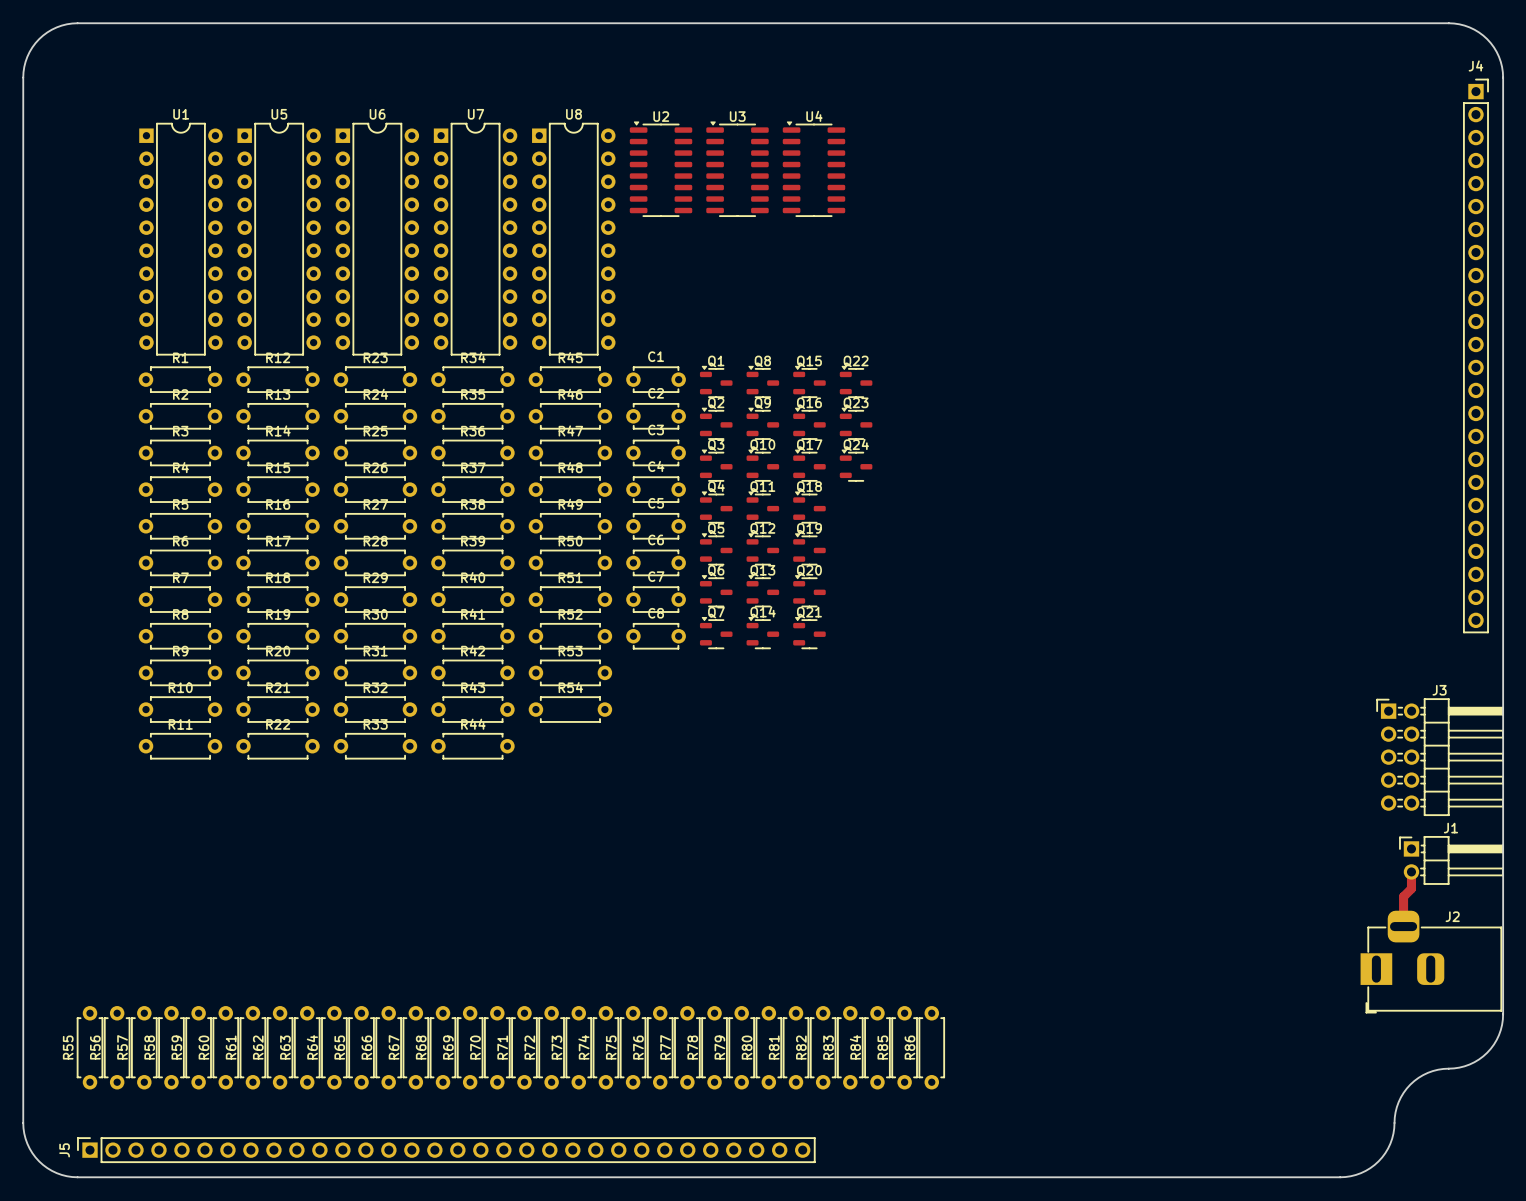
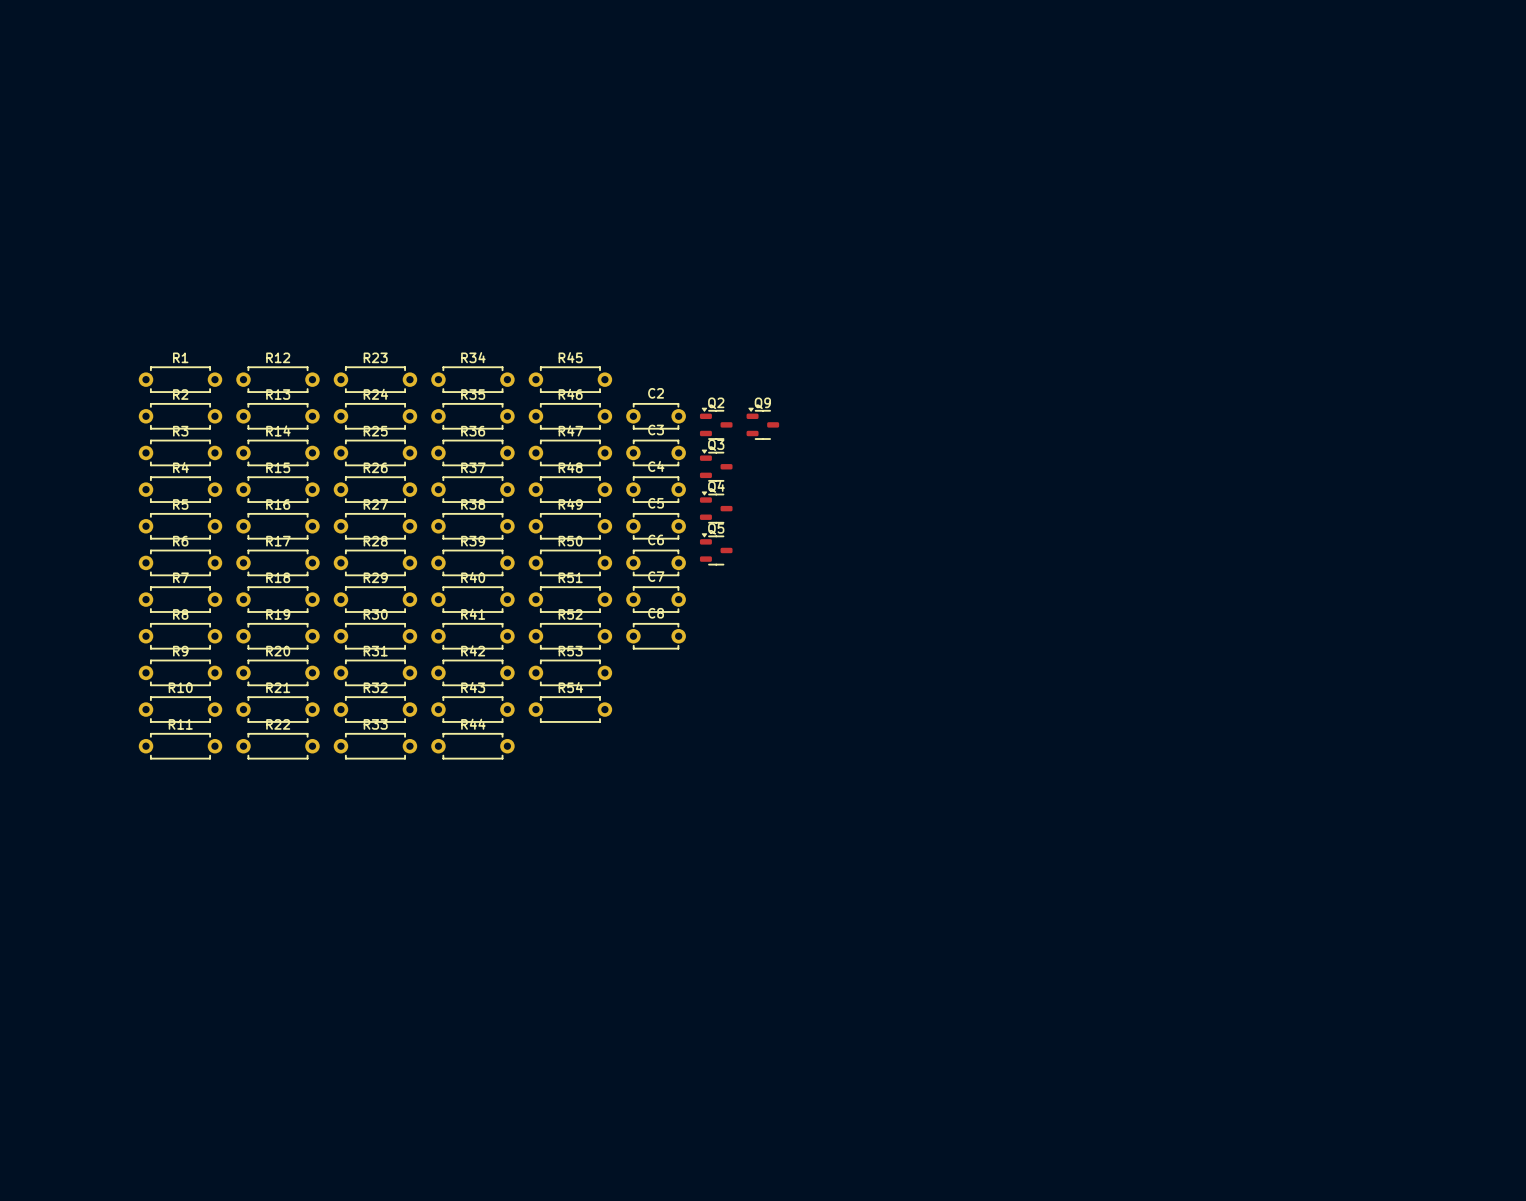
board edge: (77, 23) (1448, 23) (1464, 25) (1478, 32) (1490, 43) (1496, 51) (1502, 66) (1503, 77) (1503, 1014) (1500, 1030) (1493, 1044) (1483, 1056) (1469, 1064) (1433, 1071) (1414, 1080) (1403, 1092) (1398, 1102) (1392, 1138) (1385, 1153) (1370, 1168) (1360, 1173) (1345, 1177) (77, 1177) (61, 1174) (47, 1168) (39, 1161) (29, 1148) (25, 1138) (23, 1122) (23, 77) (27, 56) (39, 39) (56, 27) (77, 23) -> none
U2: (661, 169) -> none
U3: (737, 169) -> none
U4: (813, 169) -> none
U1: (180, 239) -> none
U5: (279, 239) -> none
U6: (377, 239) -> none
U7: (475, 239) -> none
U8: (573, 239) -> none
J4: (1475, 355) -> none
C1: (656, 379) -> none
Q1: (716, 381) -> none
Q8: (762, 381) -> none
Q15: (809, 381) -> none
Q22: (856, 381) -> none
Q16: (809, 423) -> none
Q23: (856, 423) -> none
Q10: (762, 465) -> none
Q17: (809, 465) -> none
Q24: (856, 465) -> none
Q11: (762, 507) -> none
Q18: (809, 507) -> none
Q12: (762, 549) -> none
Q19: (809, 549) -> none
Q6: (716, 591) -> none
Q13: (762, 591) -> none
Q20: (809, 591) -> none
Q7: (716, 632) -> none
Q14: (762, 632) -> none
Q21: (809, 632) -> none
J3: (1440, 757) -> none
J1: (1451, 860) -> none
track: (1411, 871) (1411, 888) (1403, 896) (1403, 926) -> none
J2: (1431, 961) -> none
R55: (90, 1047) -> none
R56: (117, 1047) -> none
R57: (144, 1047) -> none
R58: (171, 1047) -> none
R59: (198, 1047) -> none
R60: (225, 1047) -> none
R61: (252, 1047) -> none
R62: (280, 1047) -> none
R63: (307, 1047) -> none
R64: (334, 1047) -> none
R65: (361, 1047) -> none
R66: (388, 1047) -> none
R67: (415, 1047) -> none
R68: (443, 1047) -> none
R69: (470, 1047) -> none
R70: (497, 1047) -> none
R71: (524, 1047) -> none
R72: (551, 1047) -> none
R73: (578, 1047) -> none
R74: (605, 1047) -> none
R75: (633, 1047) -> none
R76: (660, 1047) -> none
R77: (687, 1047) -> none
R78: (714, 1047) -> none
R79: (741, 1047) -> none
R80: (768, 1047) -> none
R81: (796, 1047) -> none
R82: (823, 1047) -> none
R83: (850, 1047) -> none
R84: (877, 1047) -> none
R85: (904, 1047) -> none
R86: (931, 1047) -> none
J5: (446, 1150) -> none

